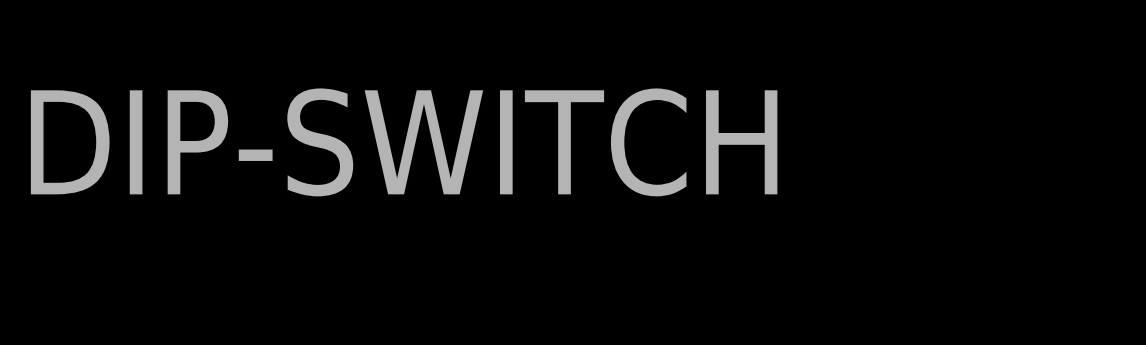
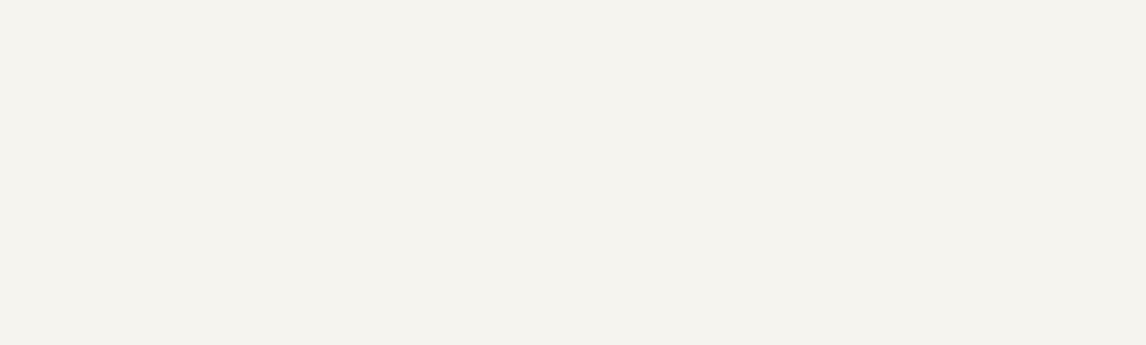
text: DIP-SWITCH (404, 142) -> none

